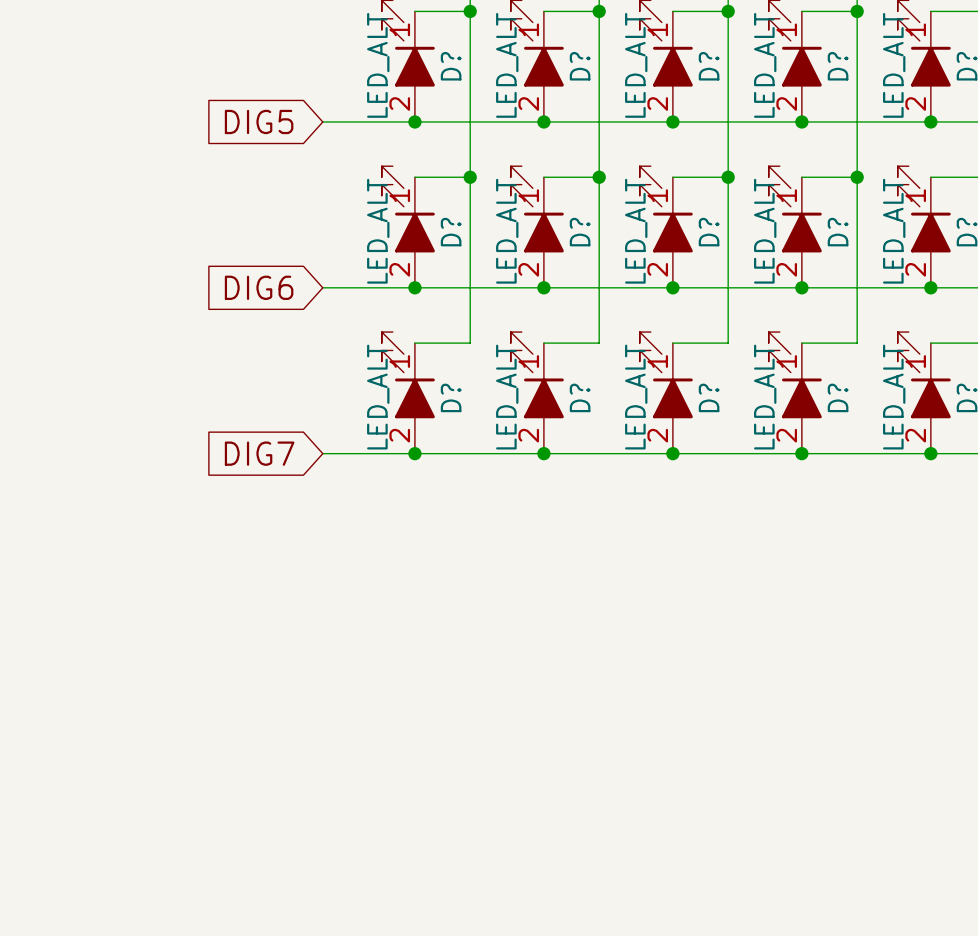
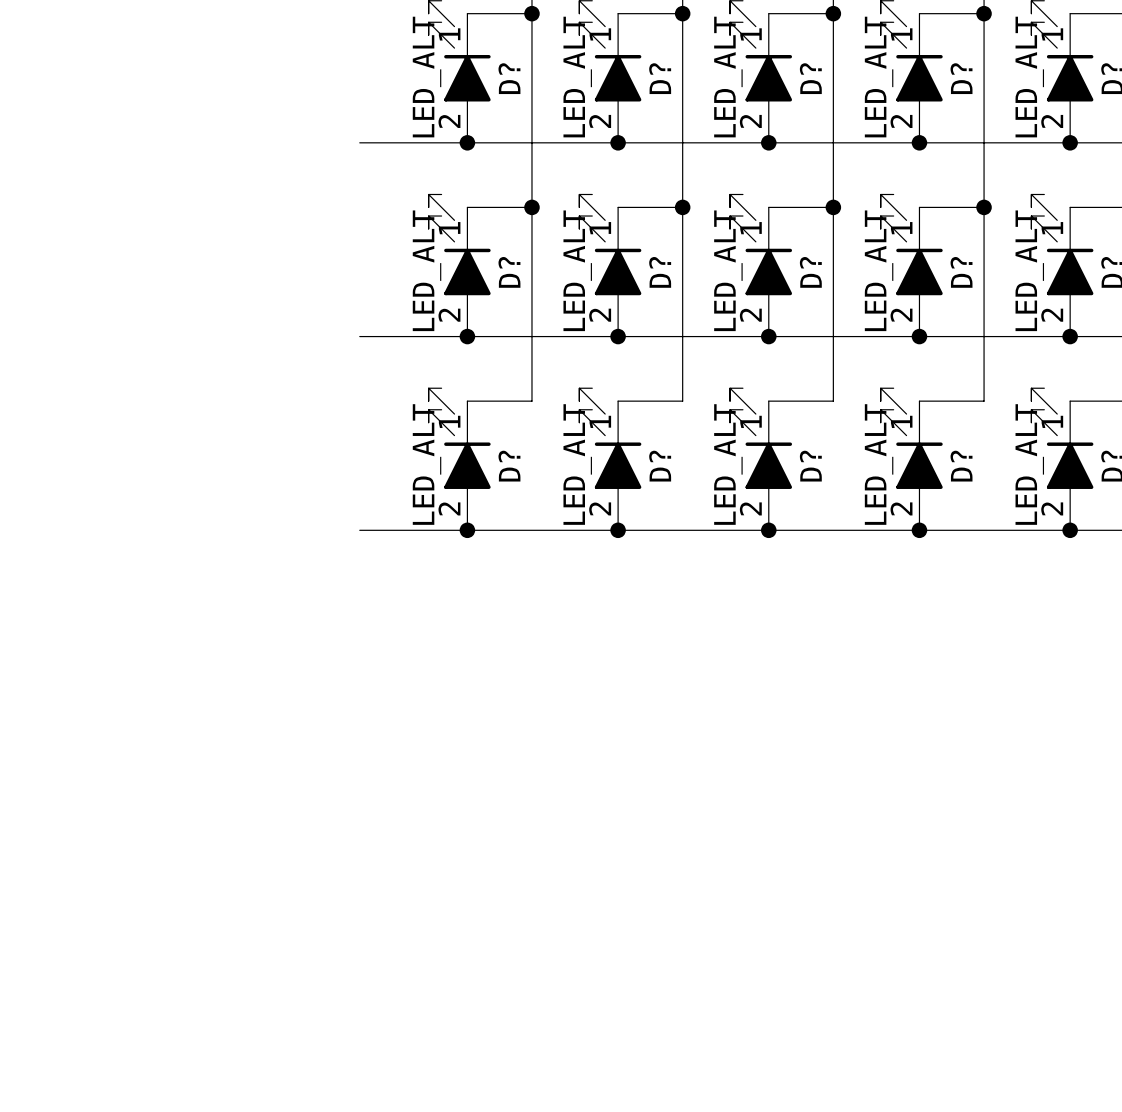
global label: DIG5 (259, 121) -> none
global label: DIG6 (259, 287) -> none
global label: DIG7 (259, 453) -> none

